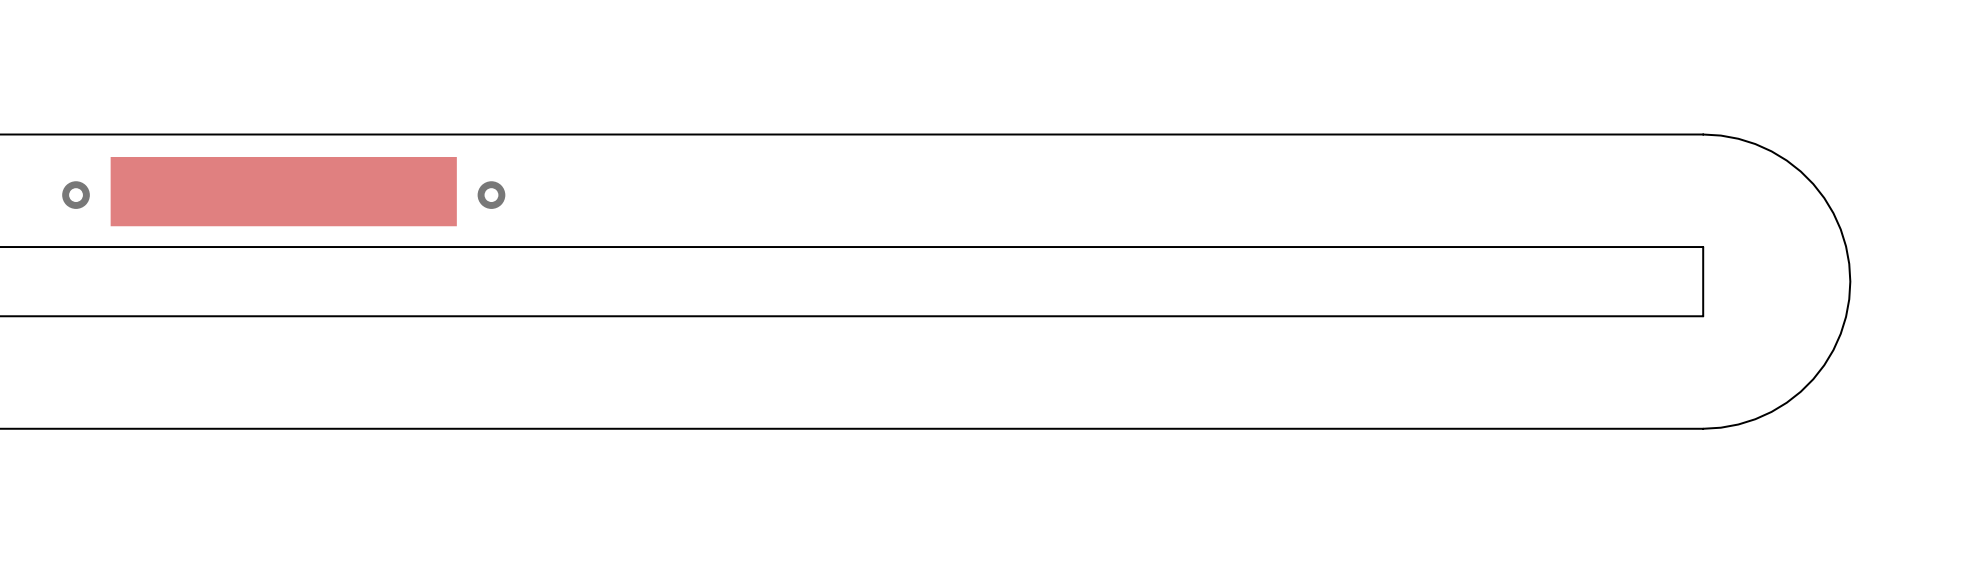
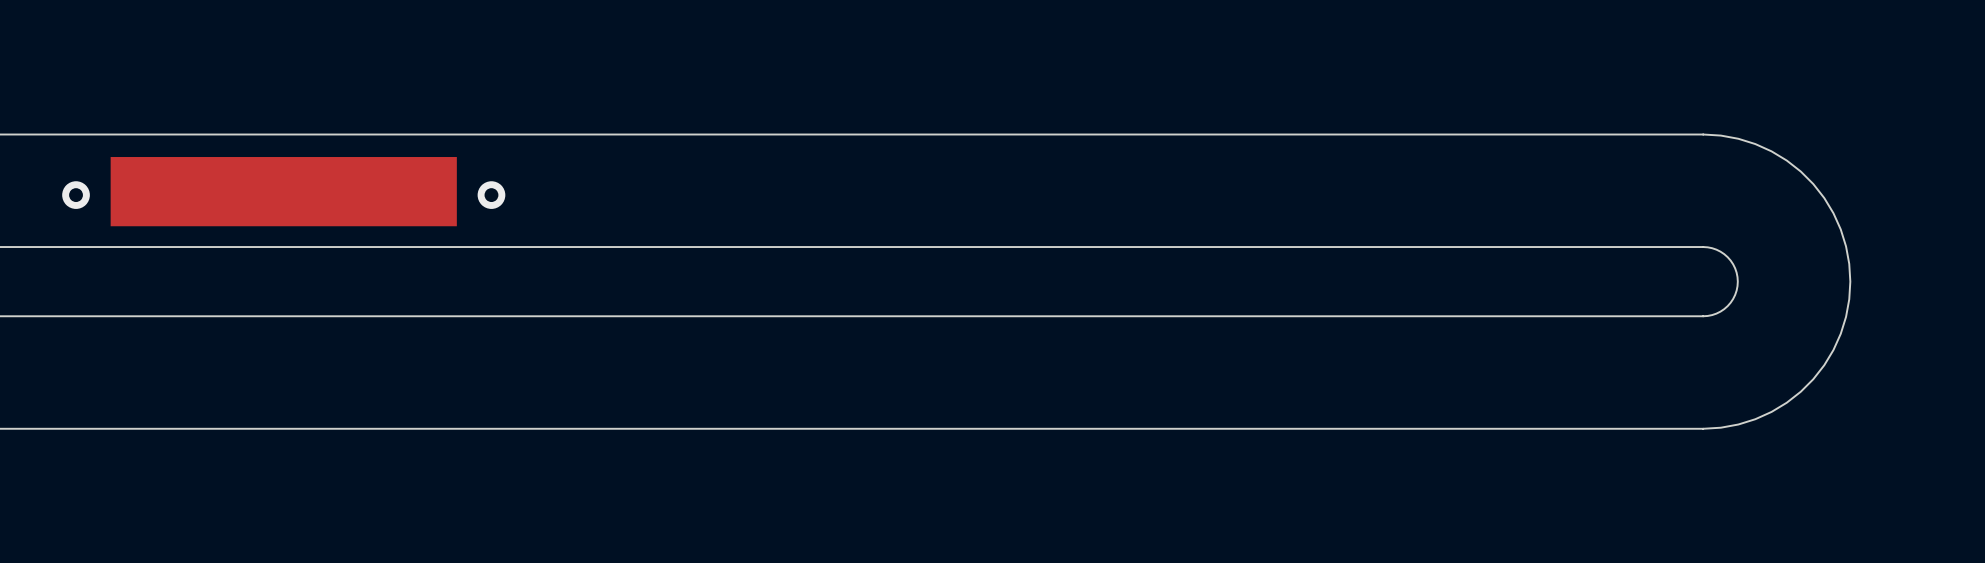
board edge: (1703, 247) (1703, 316) -> (1703, 247) (1716, 249) (1727, 257) (1735, 268) (1737, 281) (1735, 294) (1727, 306) (1716, 313) (1703, 316)

